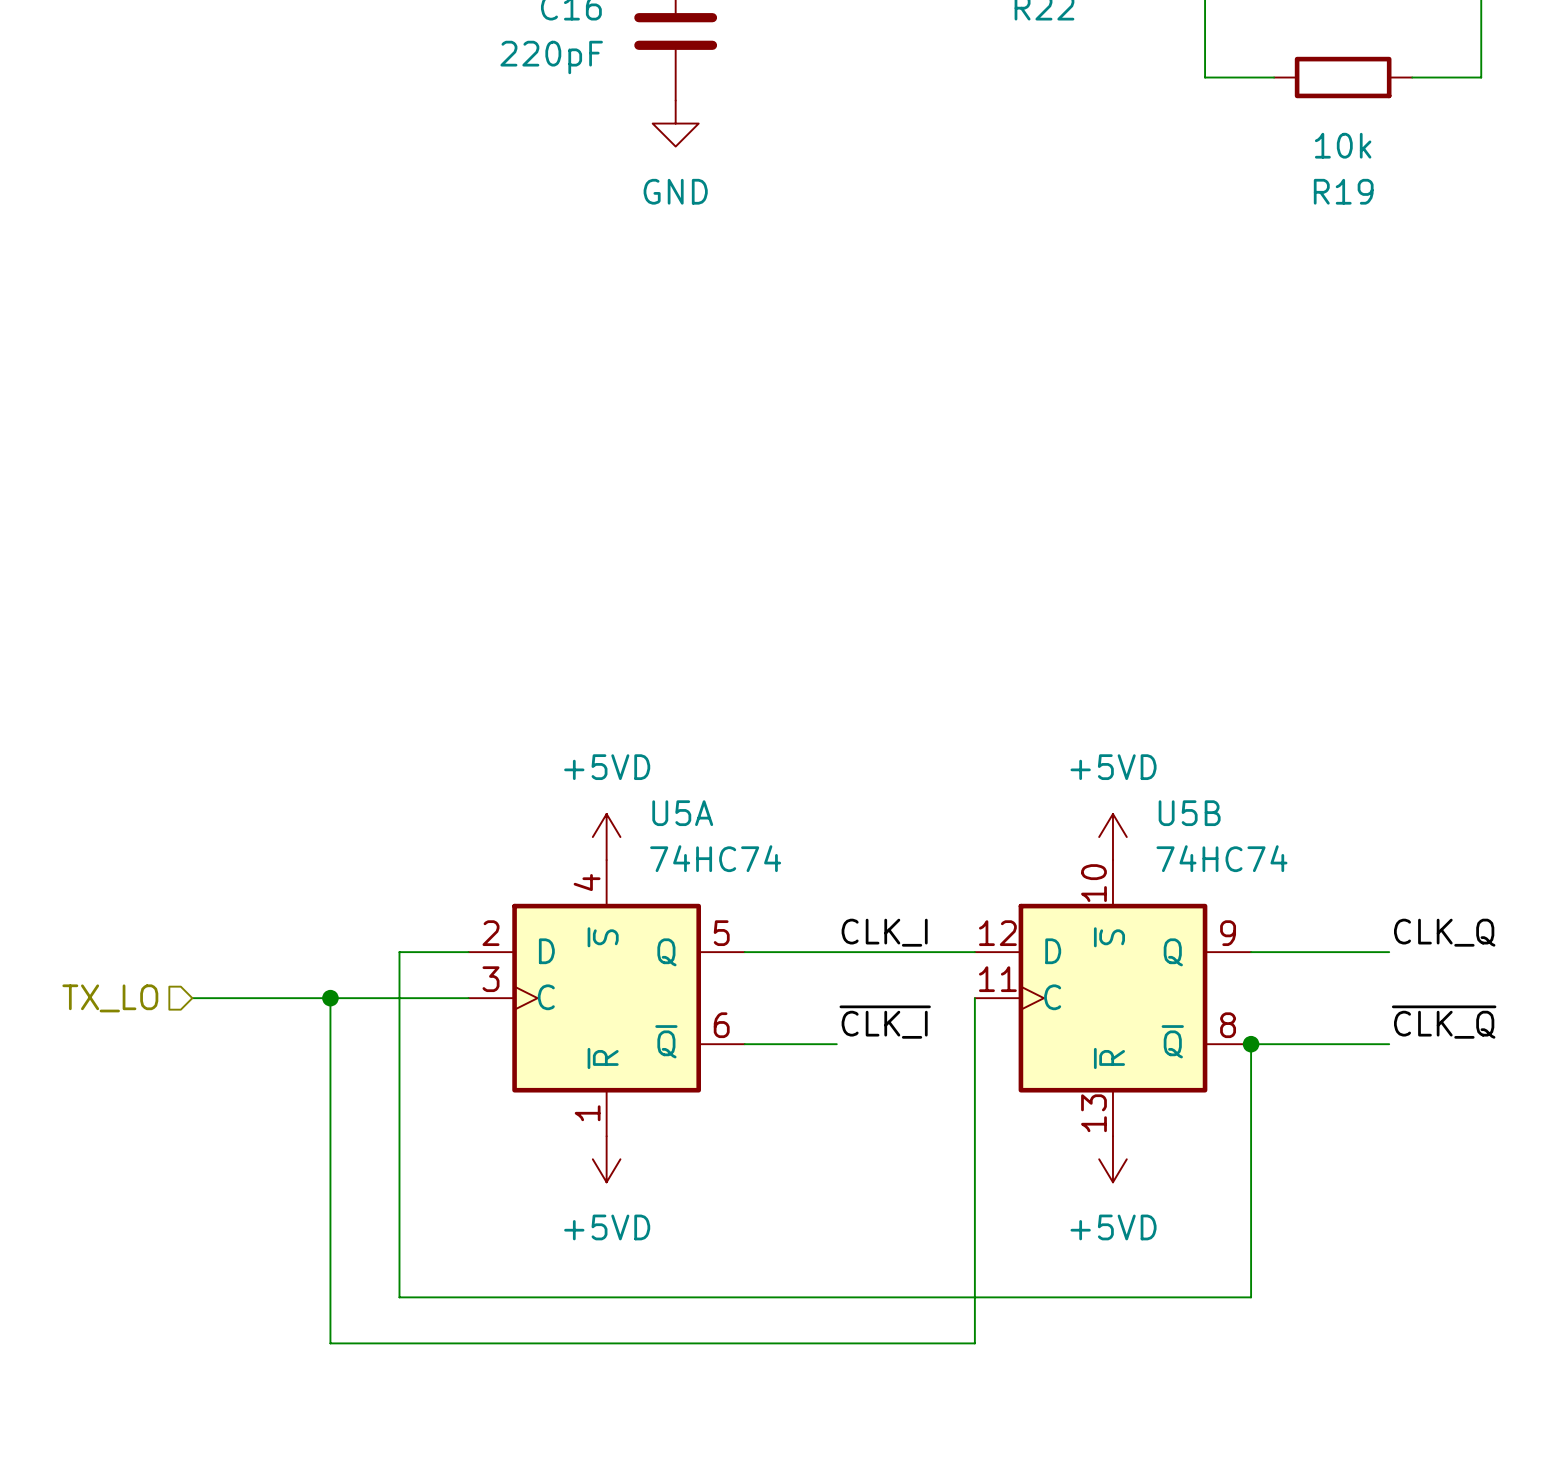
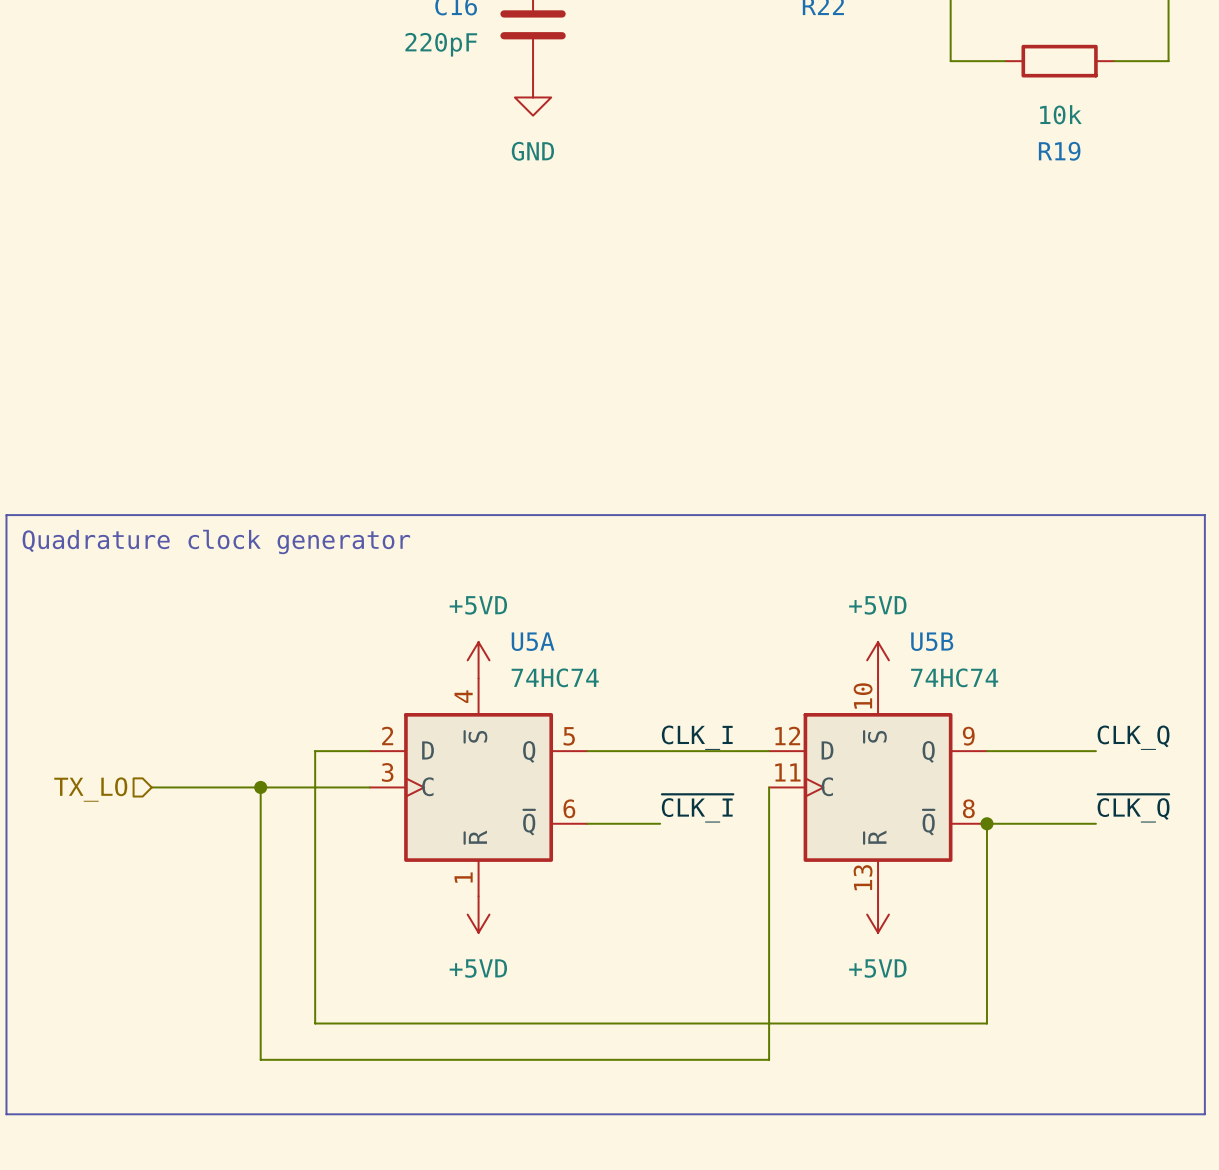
line: none -> (6, 515) (1204, 515) (1204, 1114) (6, 1114) (6, 515)
text: none -> Quadrature clock generator (216, 541)

